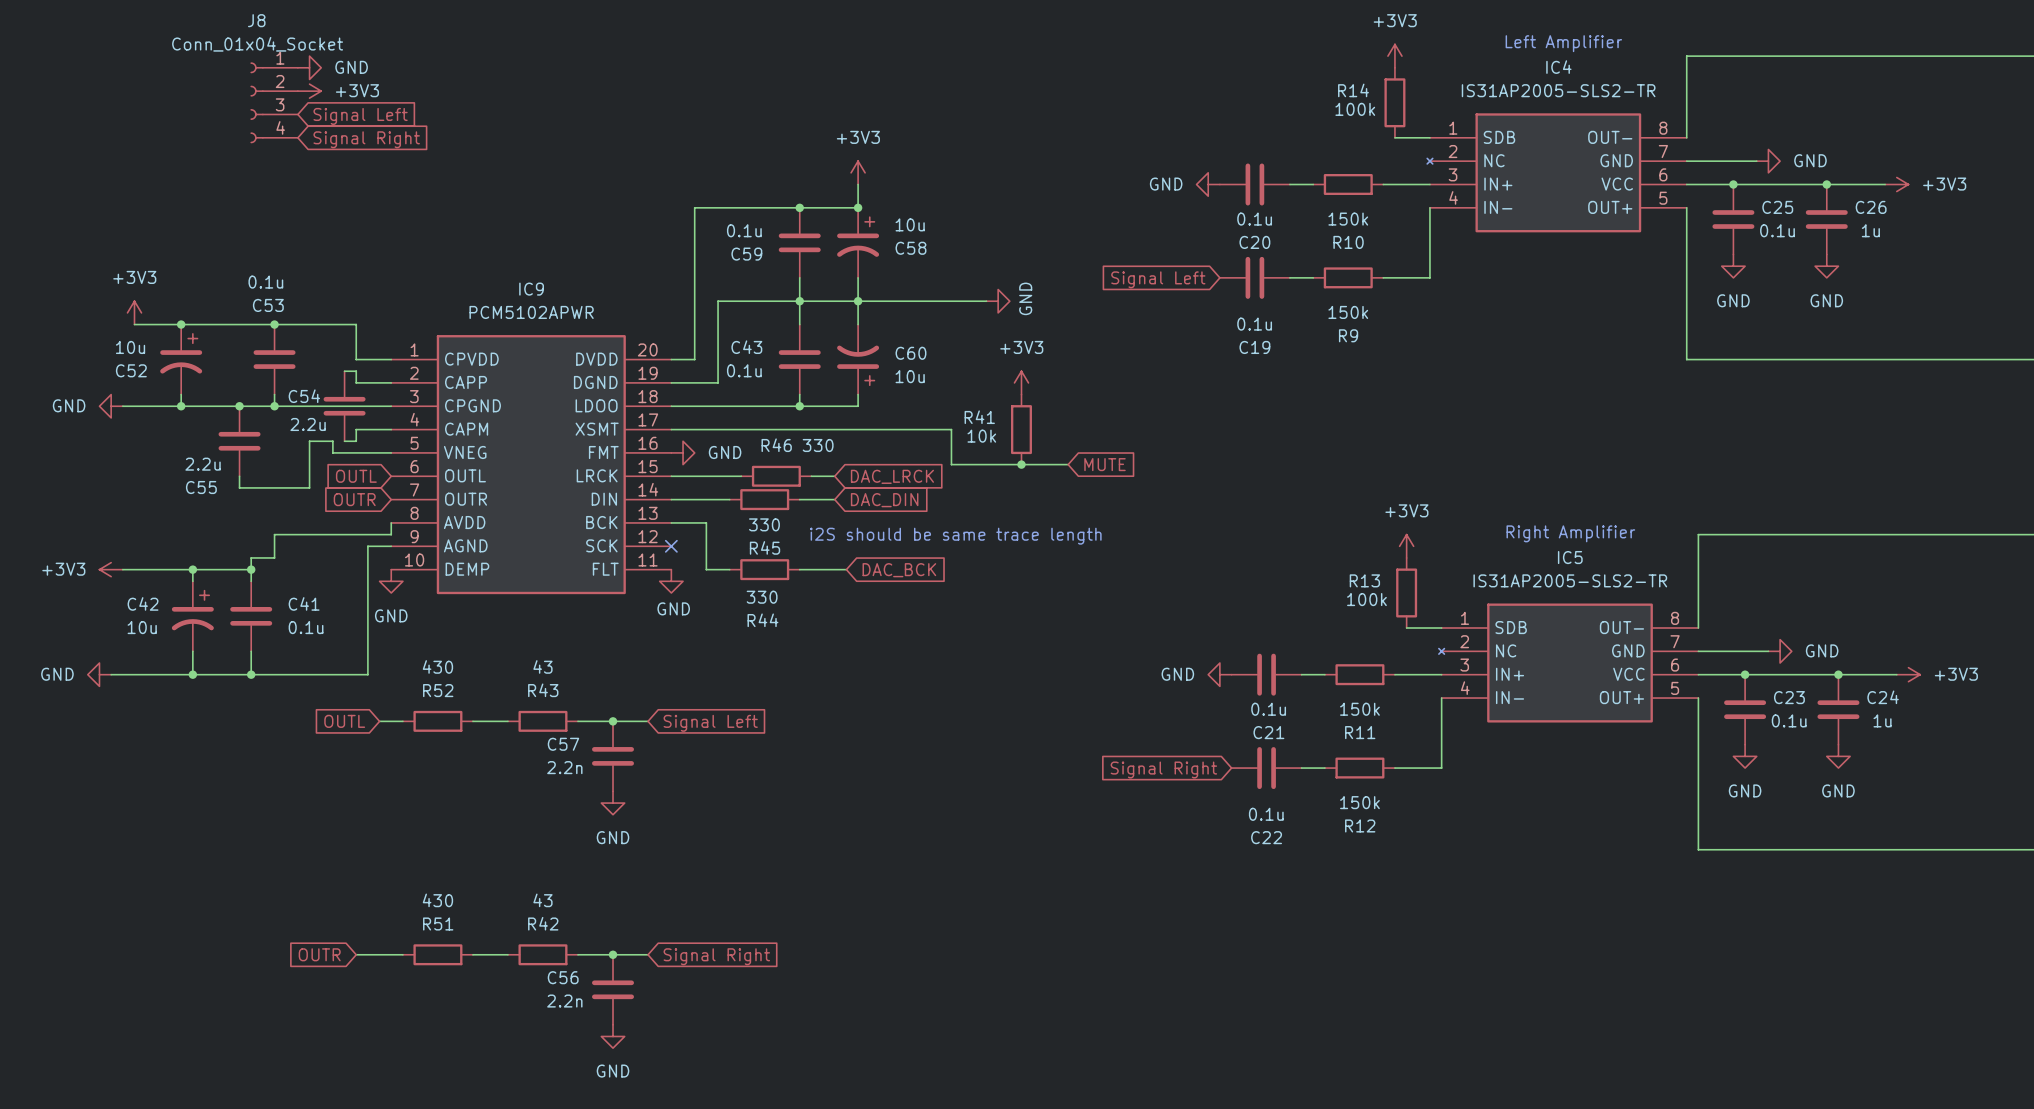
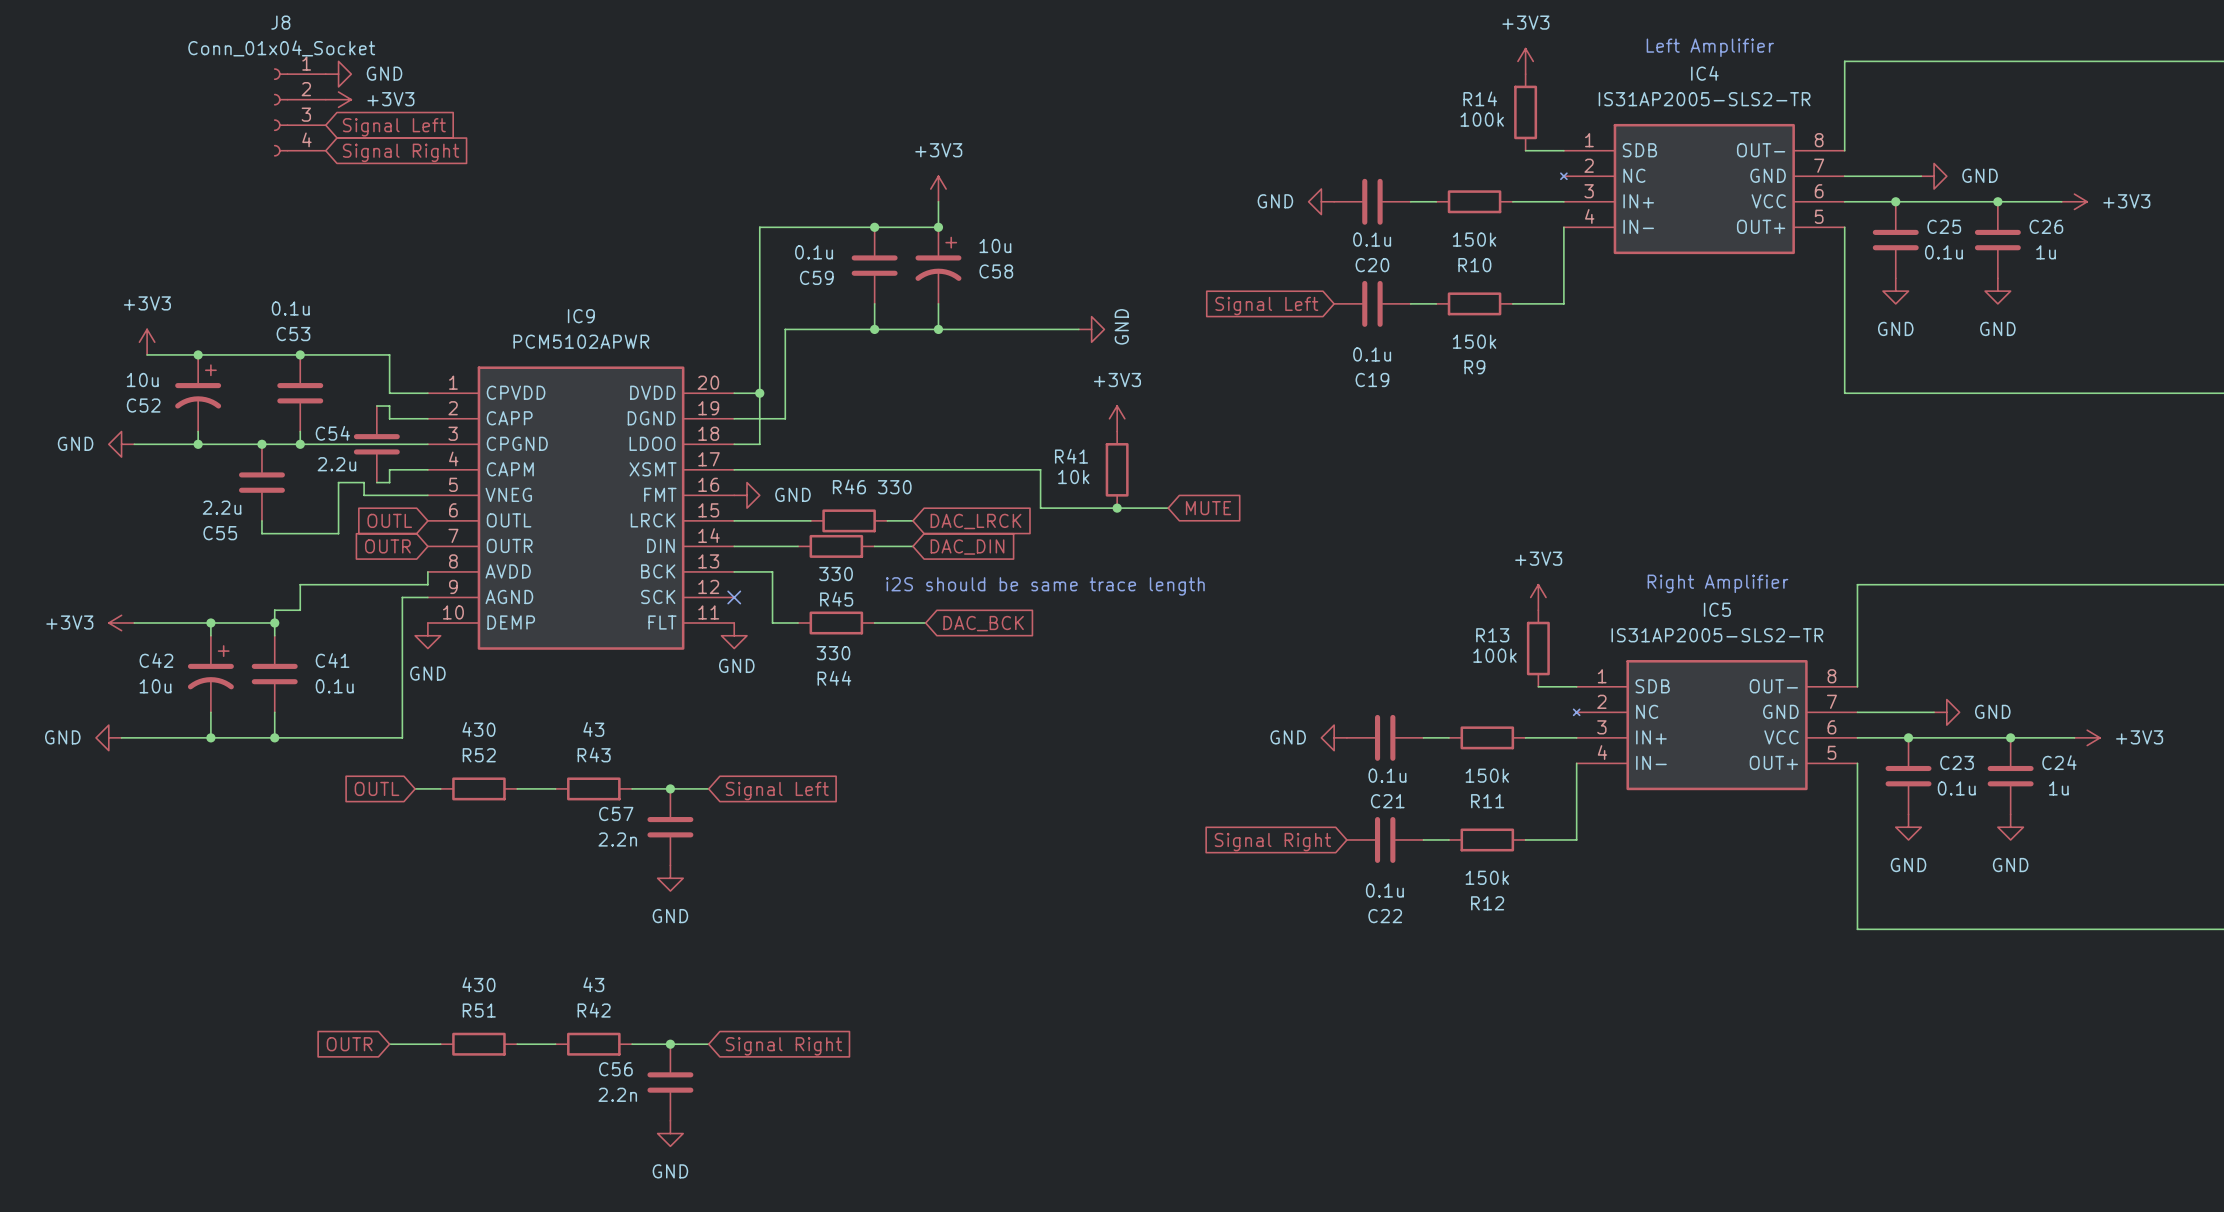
wire: (799, 301) (799, 324) -> none
wire: (858, 301) (858, 324) -> none
junction: none -> (759, 393)
C43: 0.1u (799, 359) -> none
C60: 10u (858, 359) -> none
wire: (799, 394) (799, 406) -> none
wire: (858, 394) (858, 406) (694, 406) -> (759, 393) (759, 444)
junction: (799, 406) -> none

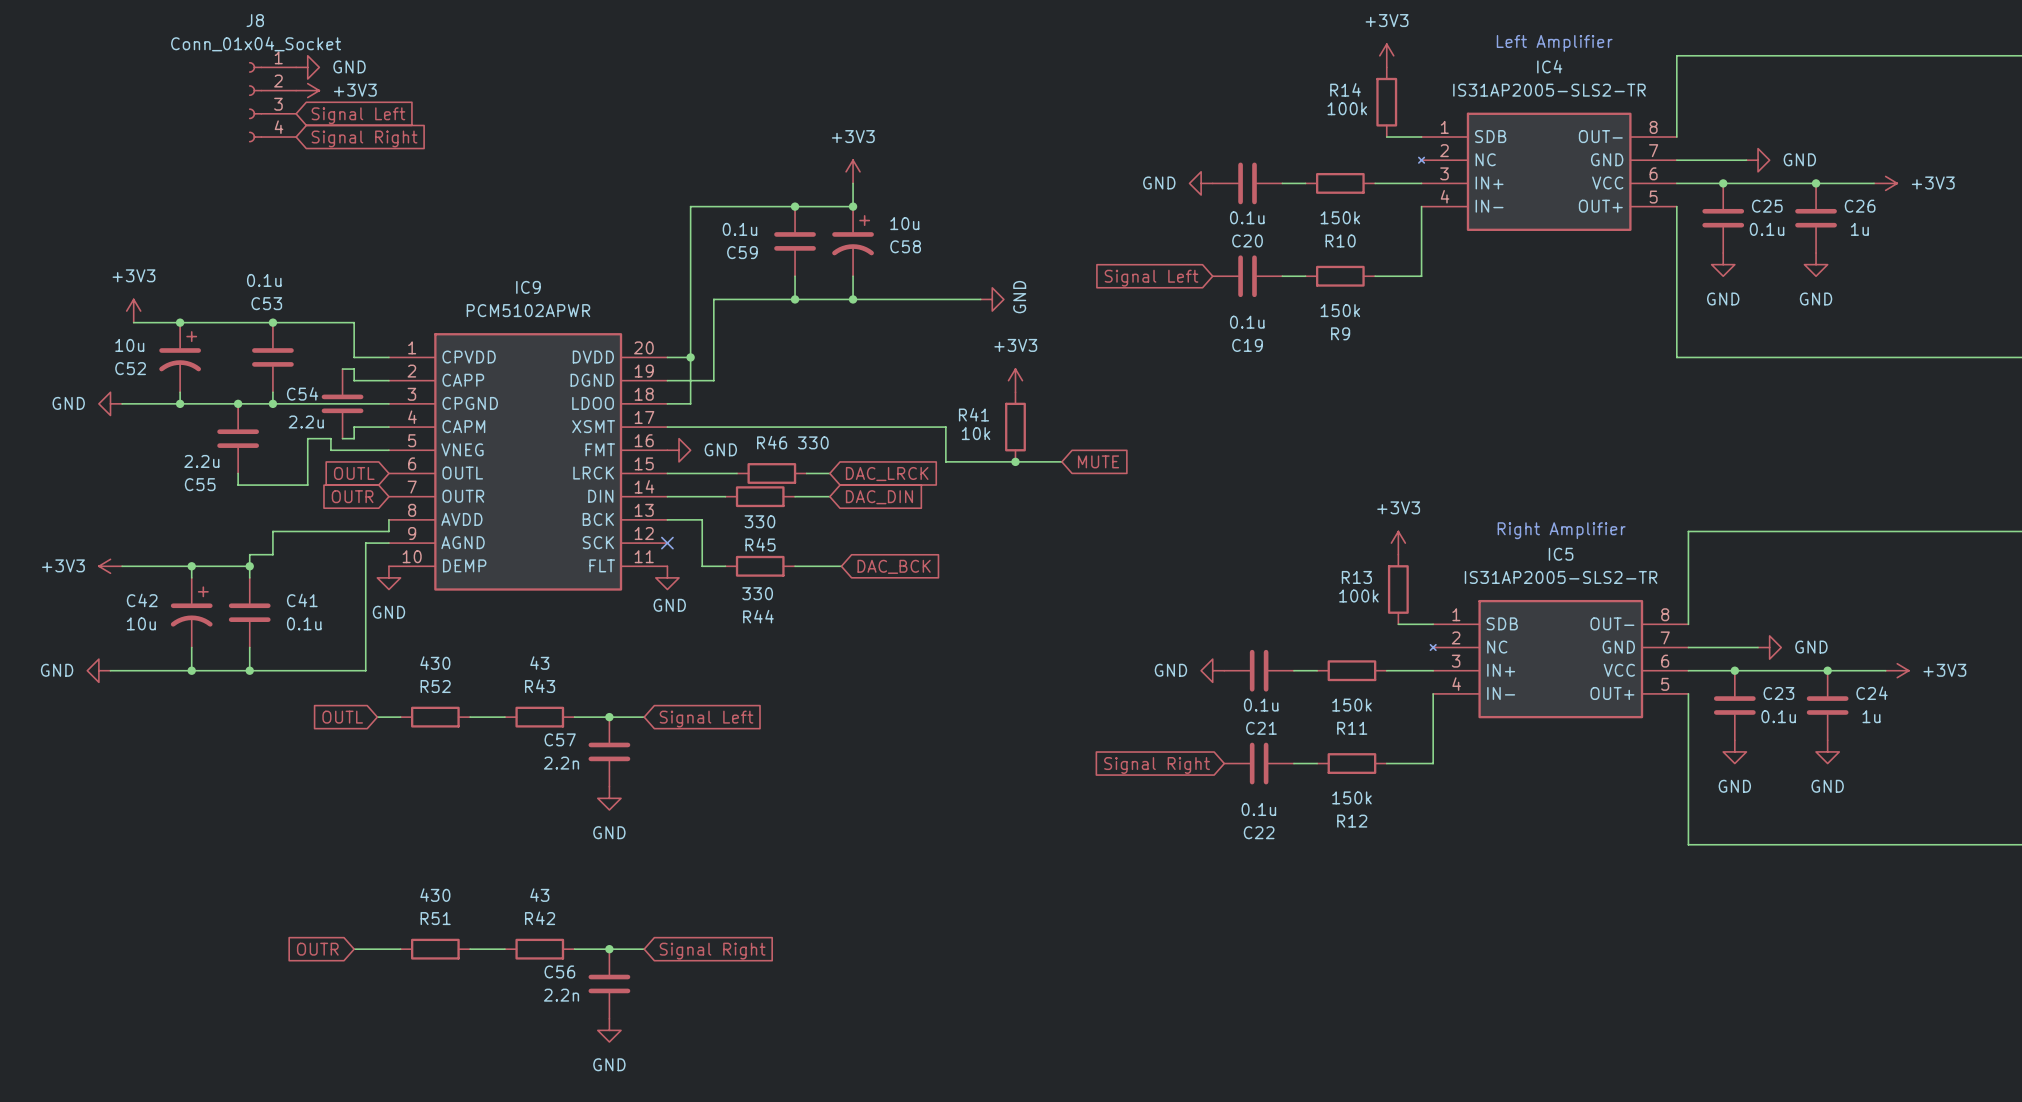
text: i2S should be same trace length (1045, 586) -> none

